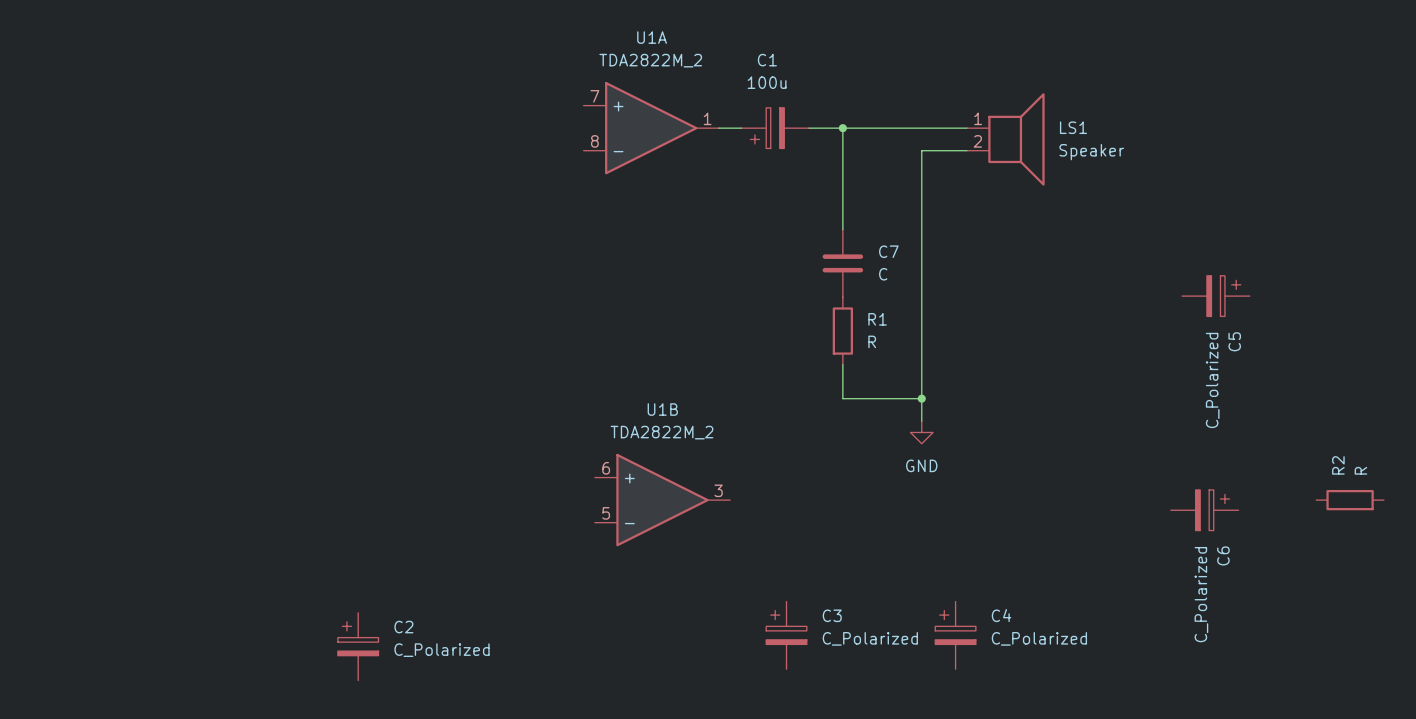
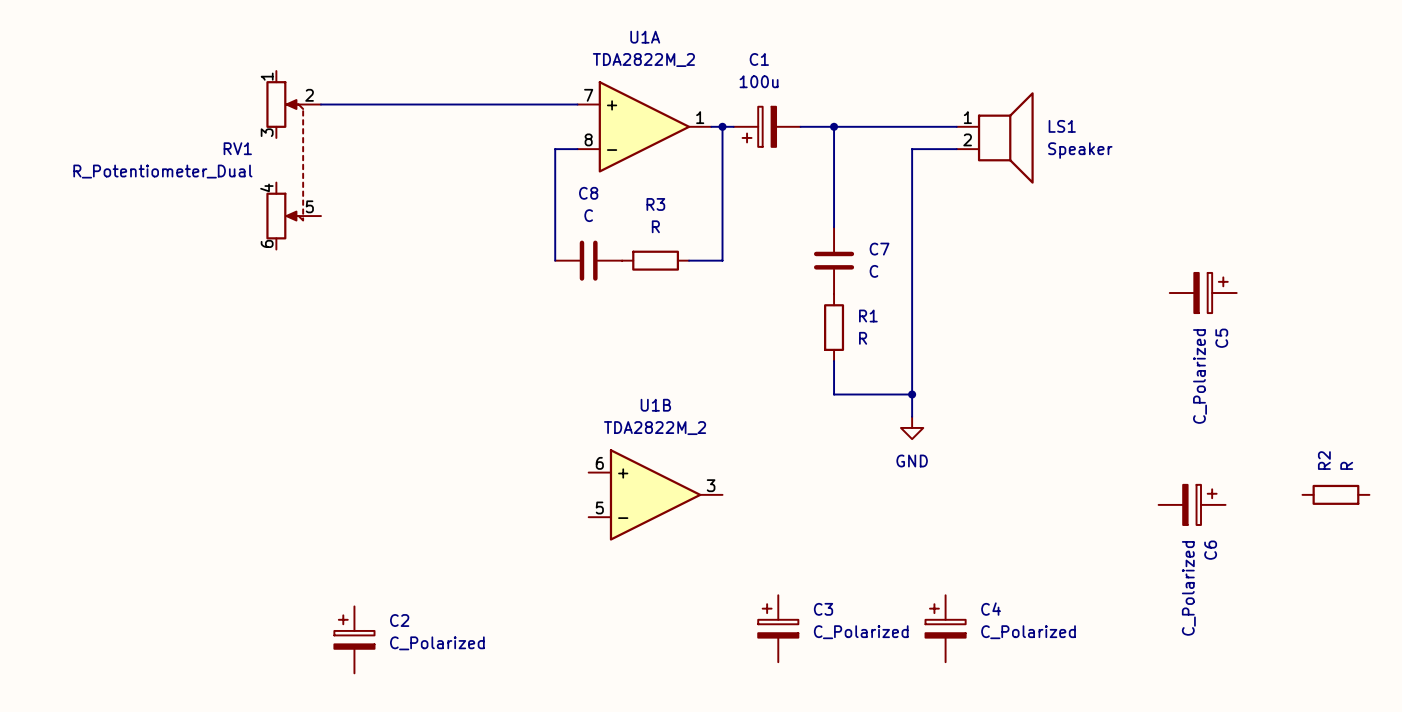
wire: none -> (320, 104) (577, 104)
wire: none -> (722, 126) (722, 260) (689, 260)
junction: none -> (722, 126)
wire: none -> (577, 149) (555, 149) (555, 260)
RV1: none -> R_Potentiometer_Dual (293, 160)
C8: none -> C (588, 260)
R3: none -> R (655, 260)

